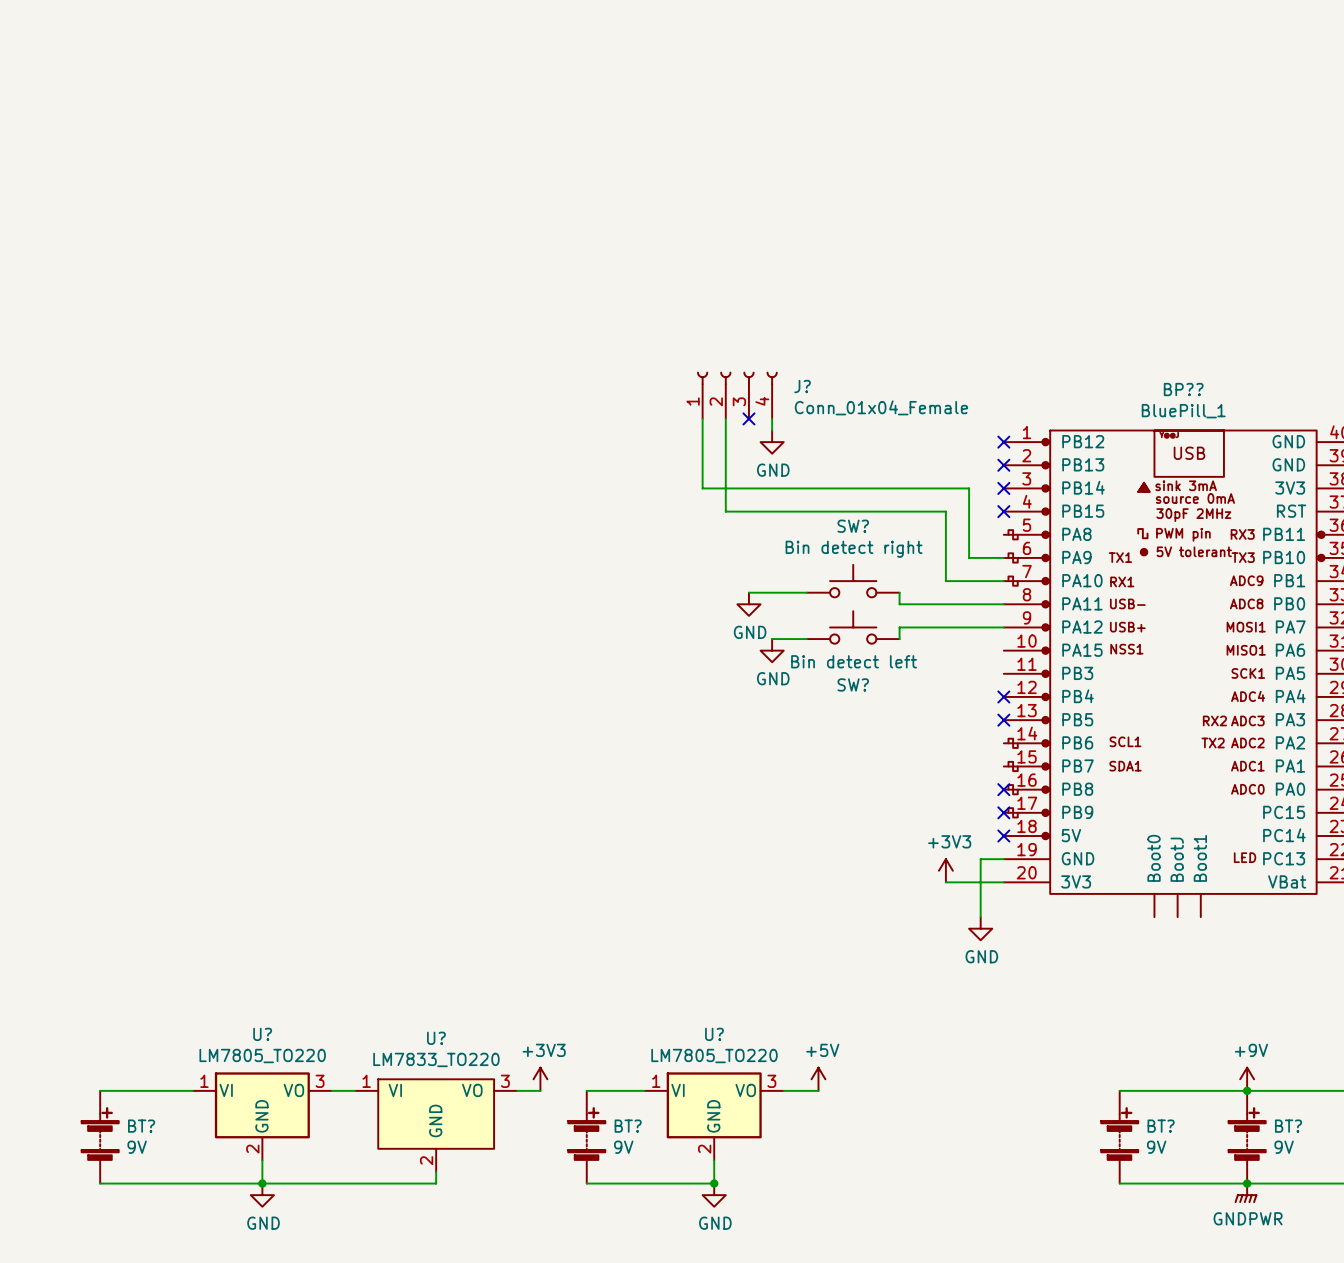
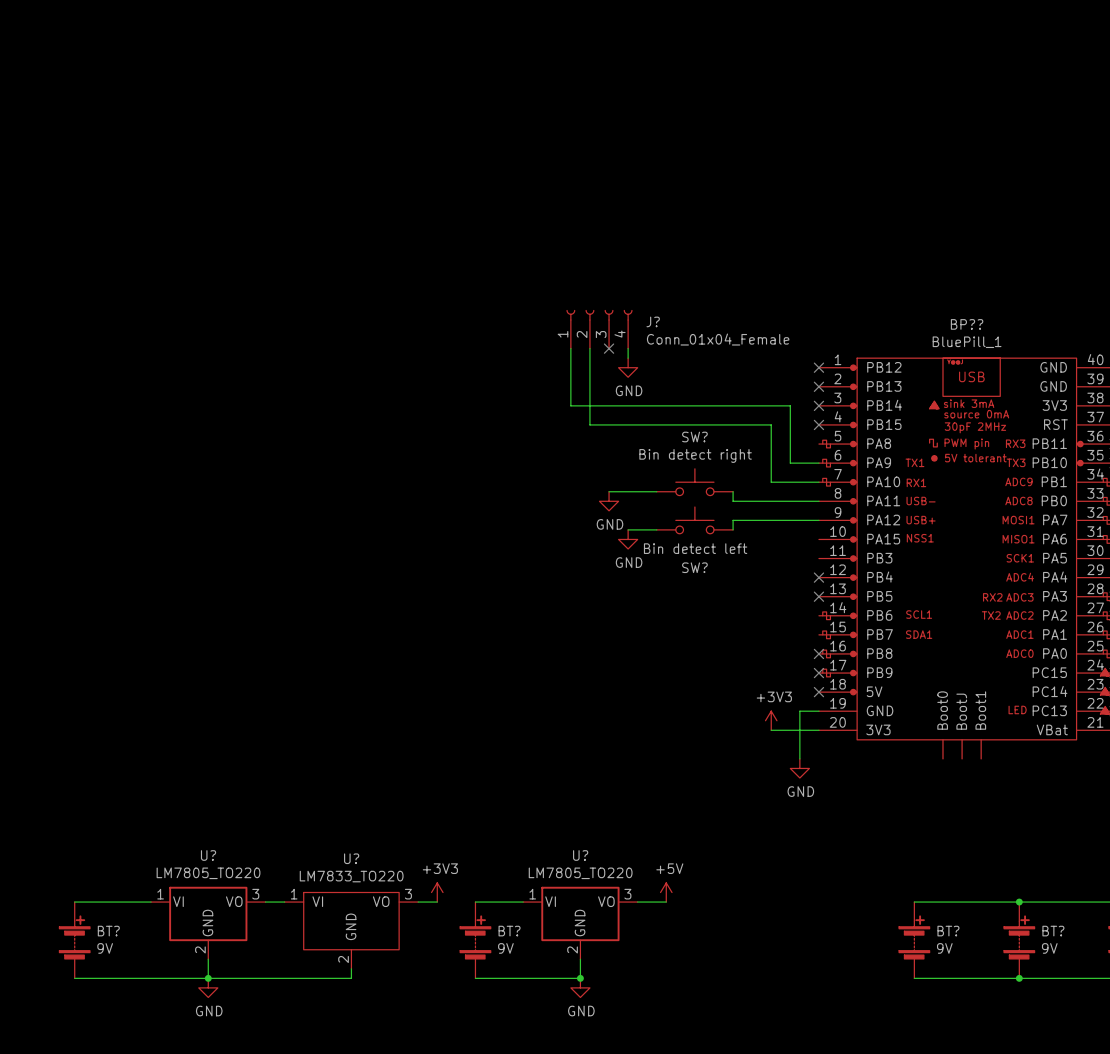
power symbol: +9V (1247, 1079) -> none
power symbol: GNDPWR (1245, 1193) -> none

